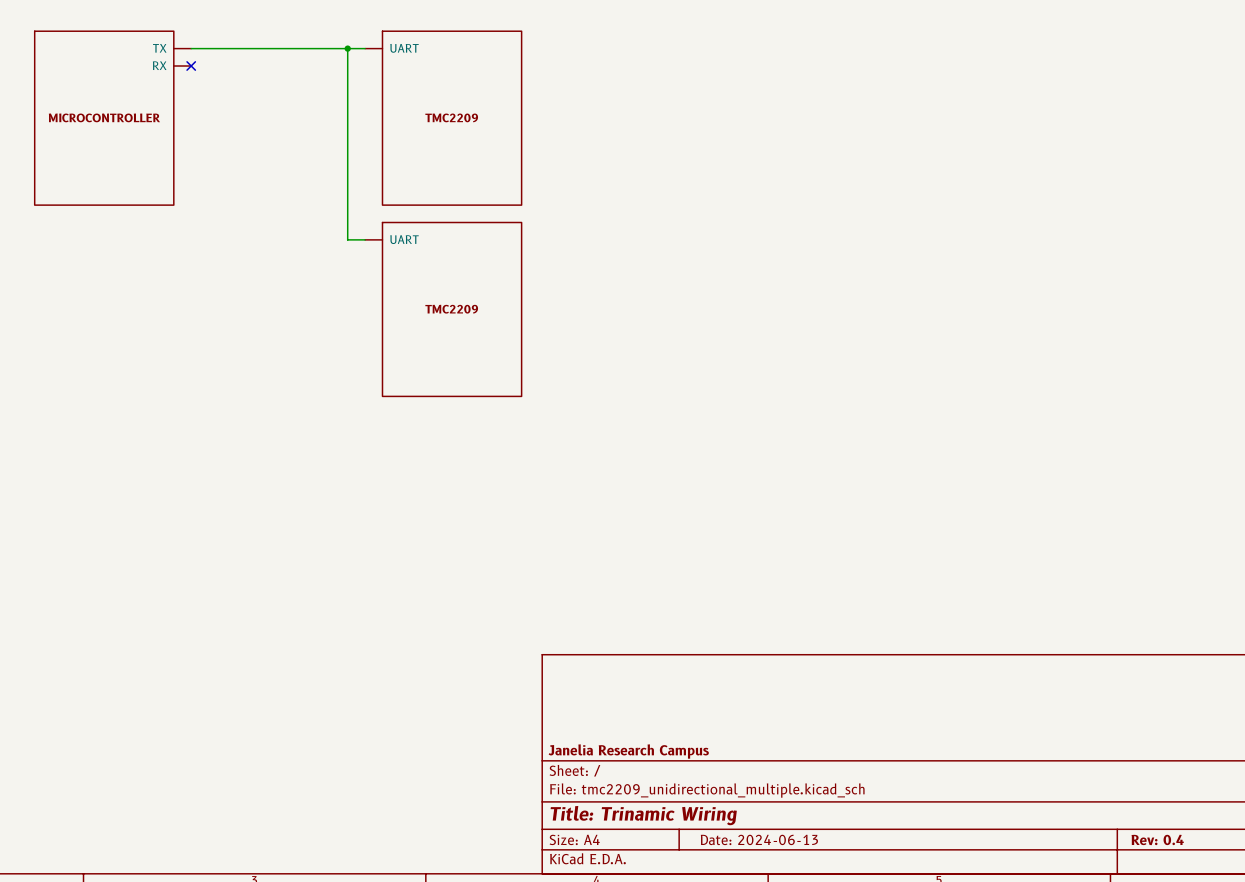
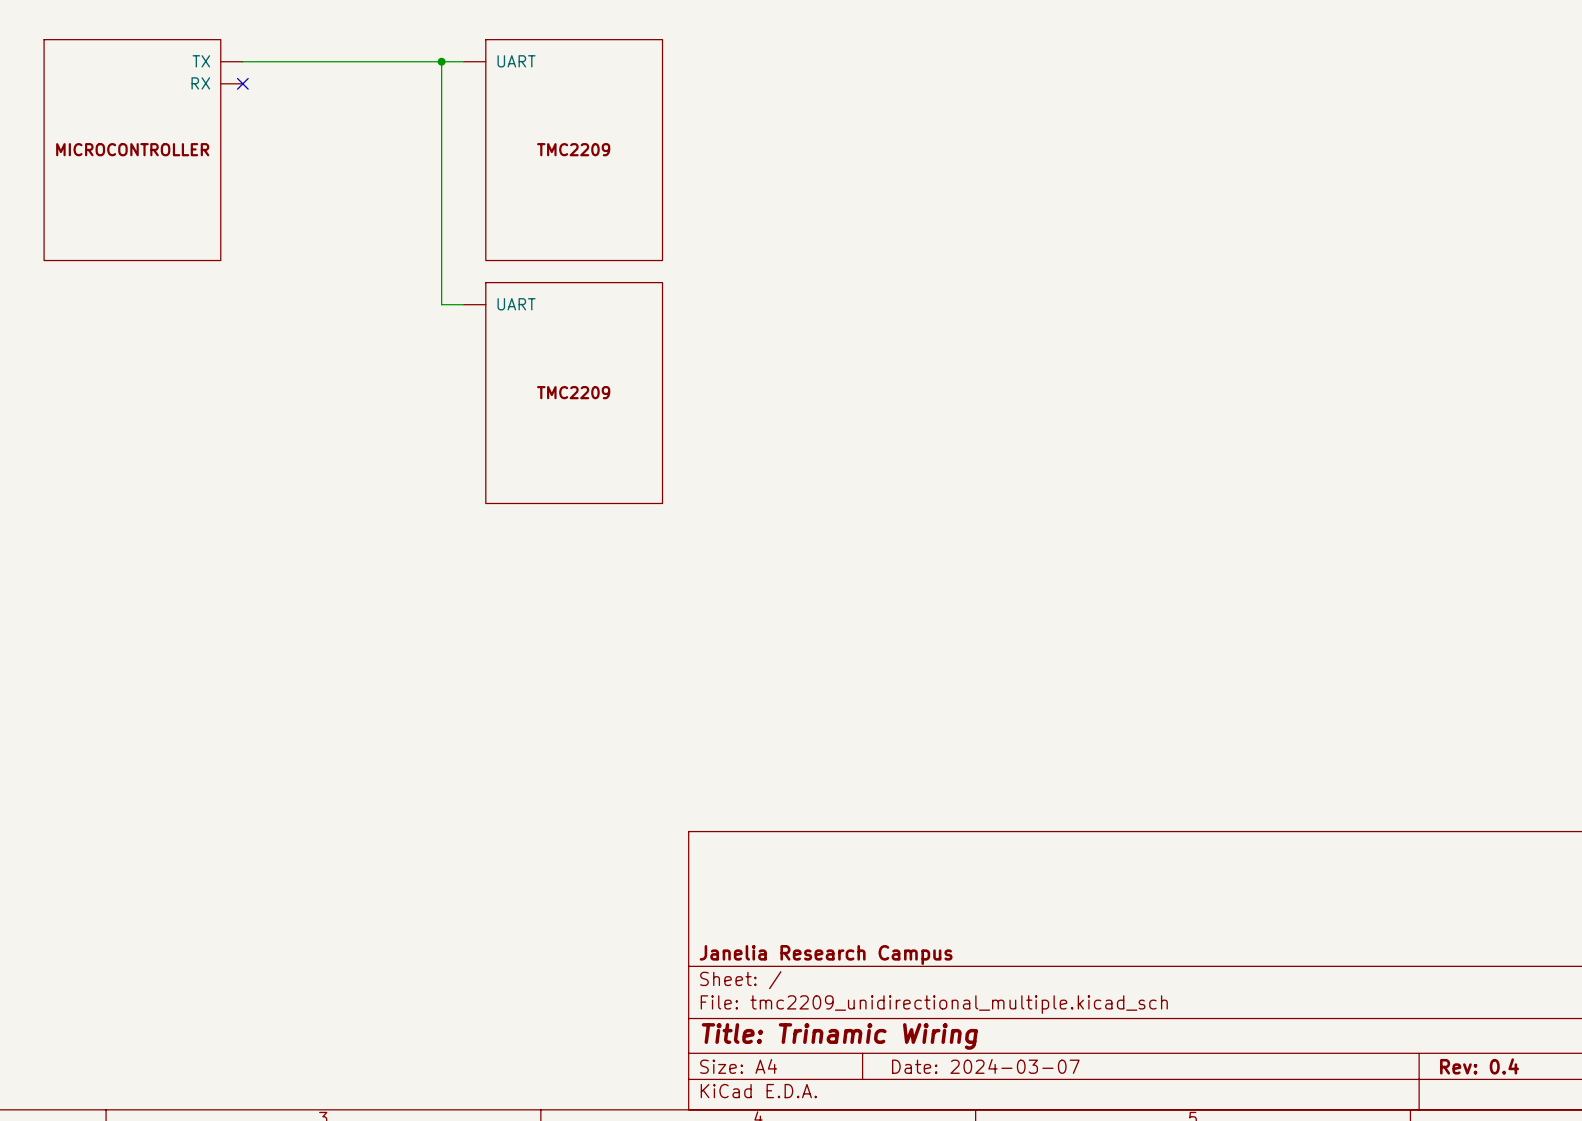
title block: Date: 2024-06-13 (759, 839) -> Date: 2024-03-07 (985, 1066)

